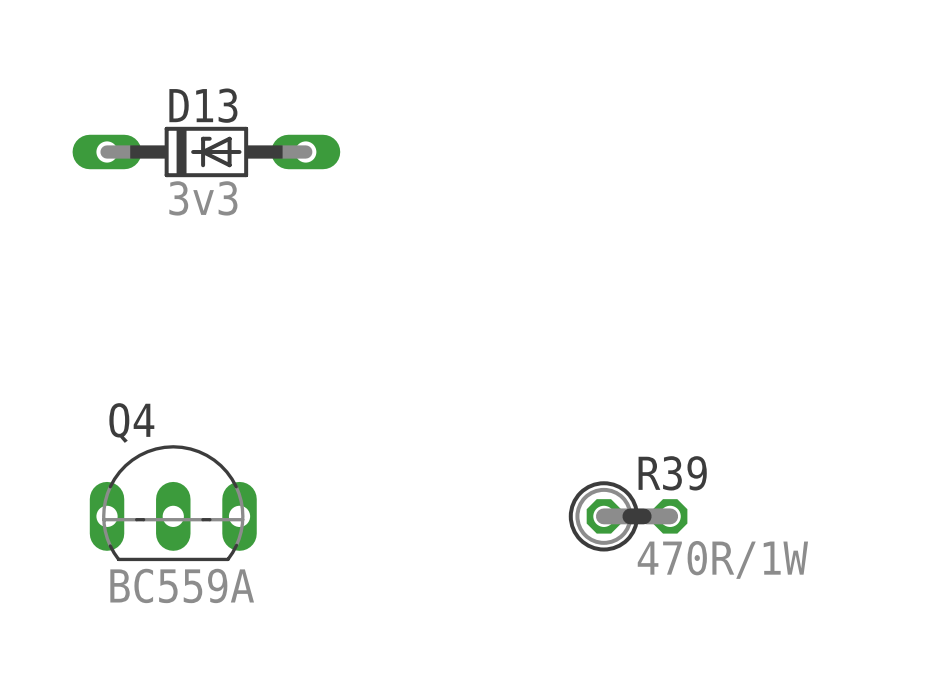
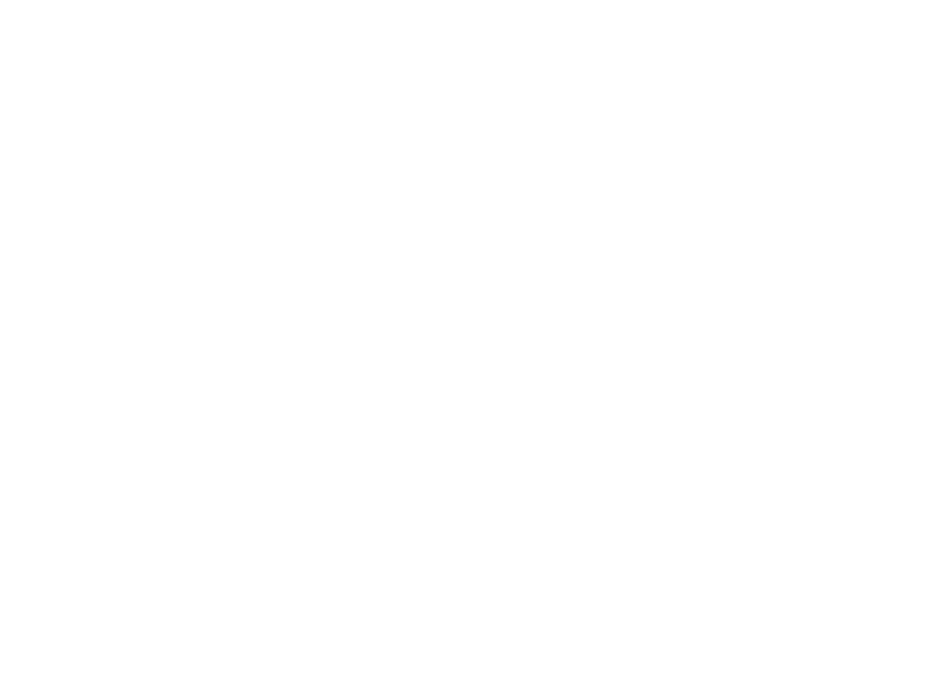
D13: 3v3 (206, 151) -> none
Q4: BC559A (173, 503) -> none
R39: 470R/1W (628, 516) -> none

